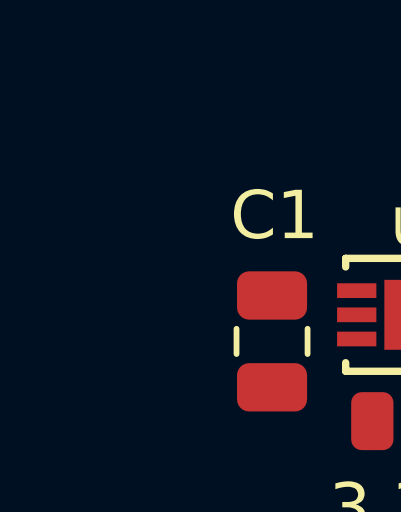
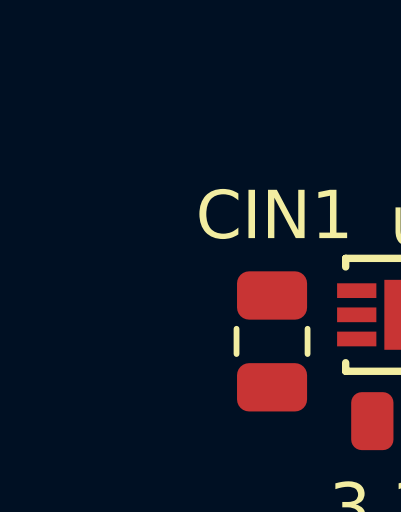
C1 name: C1 (273, 213) -> CIN1 (273, 213)

